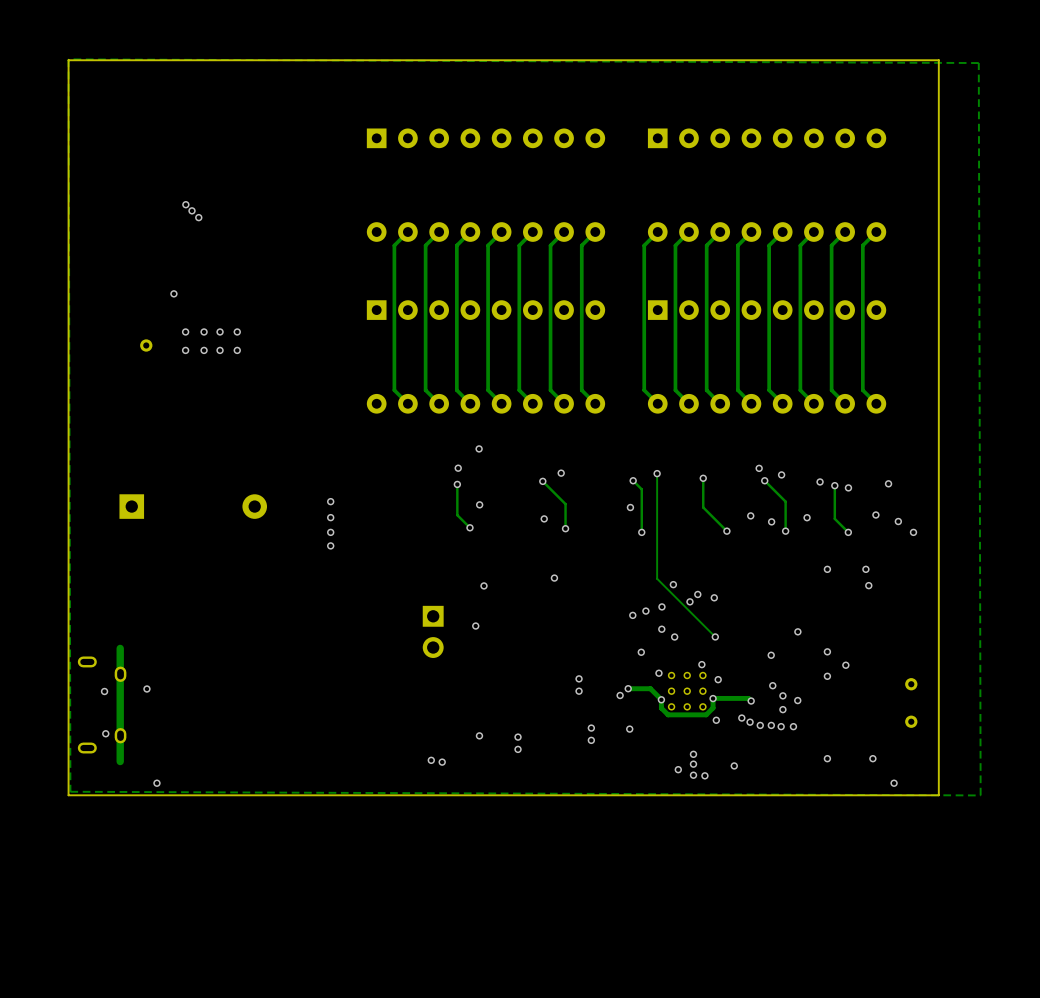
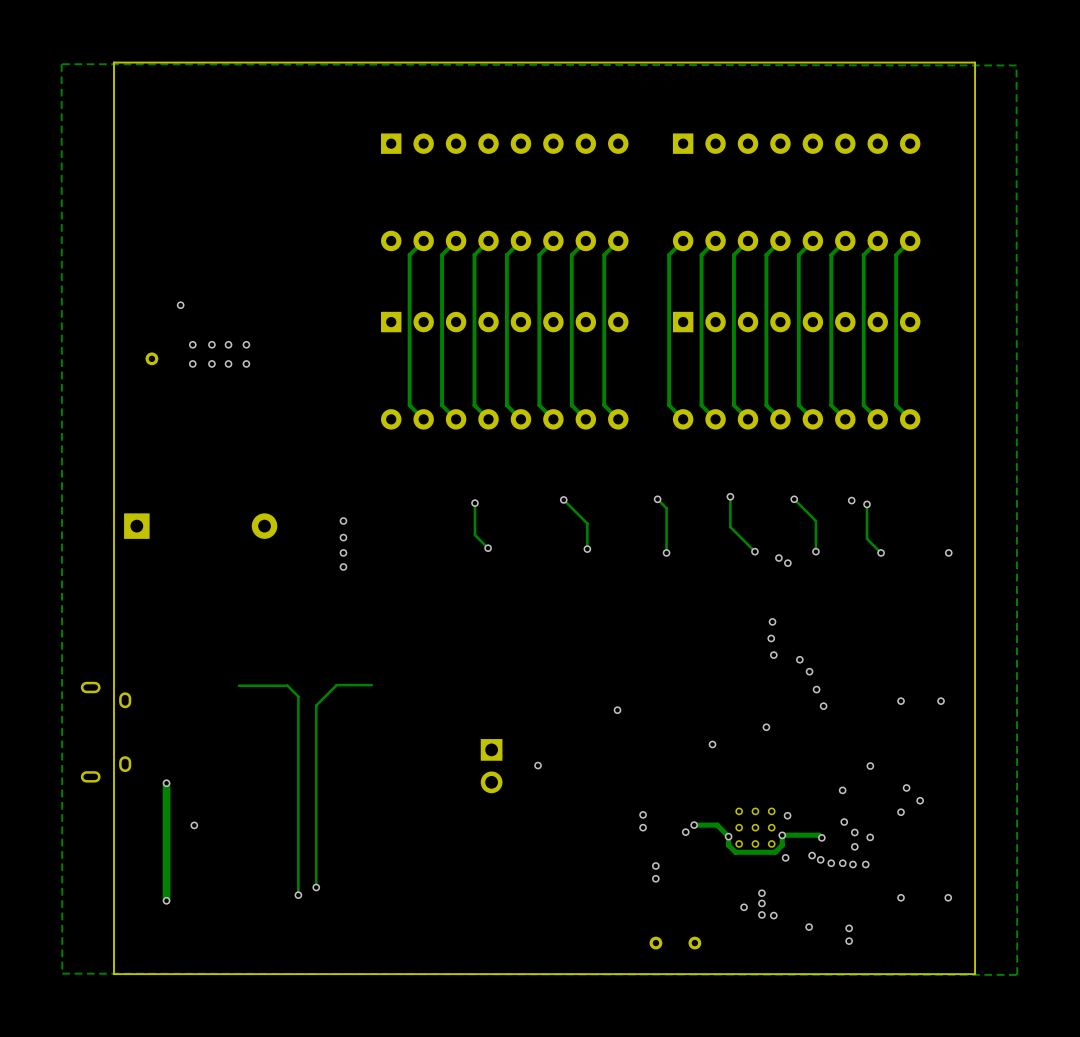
zone outline: (68, 59) (978, 63) (980, 795) (70, 791) (68, 59) -> (61, 64) (1016, 65) (1017, 974) (62, 973) (61, 64)
board edge: (109, 60) (68, 60) (68, 795) (938, 795) -> (113, 62) (113, 974) (975, 974) (975, 825)
via: (185, 204) -> none
via: (192, 210) -> none
via: (198, 217) -> none
via: (479, 448) -> none
via: (458, 468) -> none
via: (759, 468) -> none
via: (561, 473) -> none
track: (657, 473) (657, 578) (715, 636) -> none
via: (657, 473) -> none
via: (781, 474) -> none
via: (888, 483) -> none
via: (848, 487) -> none
via: (479, 504) -> none
via: (630, 507) -> none
via: (750, 515) -> none
via: (875, 515) -> none
via: (807, 517) -> none
via: (544, 518) -> none
via: (771, 521) -> none
via: (898, 521) -> none
via: none -> (778, 558)
via: none -> (787, 563)
via: (827, 569) -> none
via: (865, 569) -> none
via: (554, 578) -> none
via: (673, 584) -> none
via: (484, 585) -> none
via: (868, 585) -> none
via: (697, 594) -> none
via: (714, 597) -> none
via: none -> (772, 621)
via: (689, 601) -> none
via: (661, 606) -> none
via: (645, 611) -> none
via: none -> (771, 638)
via: (632, 615) -> none
via: (475, 626) -> none
via: (661, 629) -> none
via: none -> (773, 655)
part position: (433, 631) -> (491, 766)
via: (797, 631) -> none
via: none -> (799, 659)
via: (715, 636) -> none
via: (674, 637) -> none
via: none -> (809, 671)
track: (120, 648) (120, 761) -> (166, 783) (166, 900)
via: (827, 651) -> none
via: (641, 652) -> none
via: (771, 655) -> none
track: none -> (371, 685) (336, 685) (316, 705) (316, 887)
track: none -> (239, 685) (287, 685) (298, 696) (298, 895)
via: none -> (816, 689)
via: (701, 664) -> none
via: (845, 665) -> none
via: (658, 673) -> none
via: none -> (901, 701)
via: none -> (941, 701)
via: (827, 676) -> none
via: (579, 678) -> none
via: (718, 679) -> none
via: none -> (823, 706)
via: none -> (617, 710)
part: (911, 684) -> none
via: (772, 685) -> none
via: (146, 688) -> none
track: (628, 688) (650, 688) (661, 699) (661, 708) (668, 714) (706, 714) (713, 708) (713, 698) -> (694, 825) (717, 825) (728, 836) (728, 845) (735, 852) (775, 852) (782, 845) (782, 835)
via: (628, 688) -> none
via: (104, 691) -> none
via: (579, 691) -> none
part position: (687, 691) -> (755, 827)
via: (620, 695) -> none
via: (782, 695) -> none
track: (713, 698) (748, 698) (751, 701) -> (782, 835) (819, 835) (821, 837)
via: (713, 698) -> none
via: (661, 699) -> none
via: none -> (766, 727)
via: (797, 700) -> none
via: (751, 701) -> none
via: (782, 709) -> none
via: none -> (712, 744)
via: (741, 718) -> none
via: (716, 720) -> none
part: (911, 721) -> none
via: (750, 722) -> none
via: (760, 725) -> none
via: (771, 725) -> none
via: (781, 726) -> none
via: (793, 726) -> none
via: (591, 728) -> none
via: (629, 729) -> none
via: (105, 733) -> none
via: (479, 735) -> none
via: none -> (870, 766)
via: (591, 740) -> none
via: (518, 749) -> none
via: none -> (166, 783)
via: (693, 754) -> none
via: (827, 758) -> none
via: (431, 760) -> none
via: none -> (842, 790)
via: (442, 762) -> none
via: (693, 764) -> none
via: (734, 765) -> none
via: (678, 769) -> none
via: none -> (920, 800)
via: (693, 775) -> none
via: (704, 775) -> none
via: none -> (901, 812)
via: (156, 783) -> none
via: (894, 783) -> none
via: none -> (643, 814)
via: none -> (787, 815)
via: none -> (844, 822)
via: none -> (194, 825)
via: none -> (694, 825)
via: none -> (643, 827)
via: none -> (685, 832)
via: none -> (854, 832)
via: none -> (782, 835)
via: none -> (728, 836)
via: none -> (821, 837)
via: none -> (870, 837)
via: none -> (854, 846)
via: none -> (812, 855)
via: none -> (785, 857)
via: none -> (820, 859)
via: none -> (831, 863)
via: none -> (842, 863)
via: none -> (852, 864)
via: none -> (865, 864)
via: none -> (655, 865)
via: none -> (655, 878)
via: none -> (316, 887)
via: none -> (761, 893)
via: none -> (298, 895)
via: none -> (901, 897)
via: none -> (948, 897)
via: none -> (166, 900)
via: none -> (761, 903)
via: none -> (744, 907)
via: none -> (761, 914)
via: none -> (773, 915)
via: none -> (809, 927)
via: none -> (849, 928)
via: none -> (849, 941)
part: none -> (655, 943)
part: none -> (694, 943)

